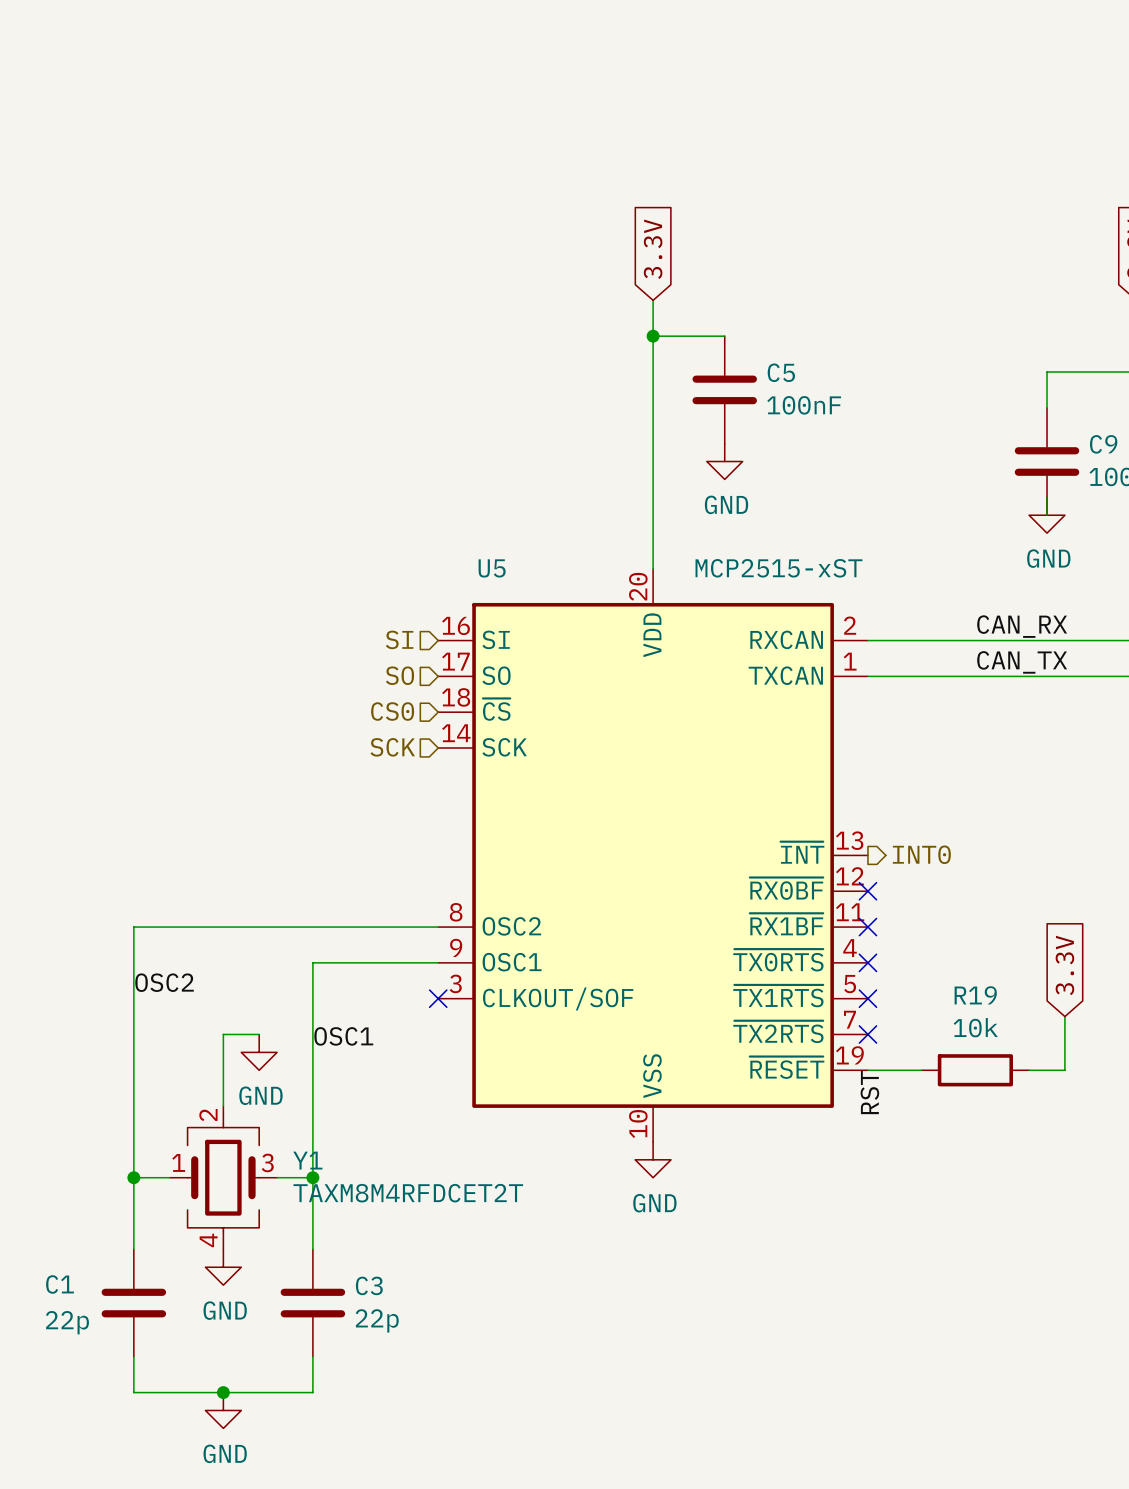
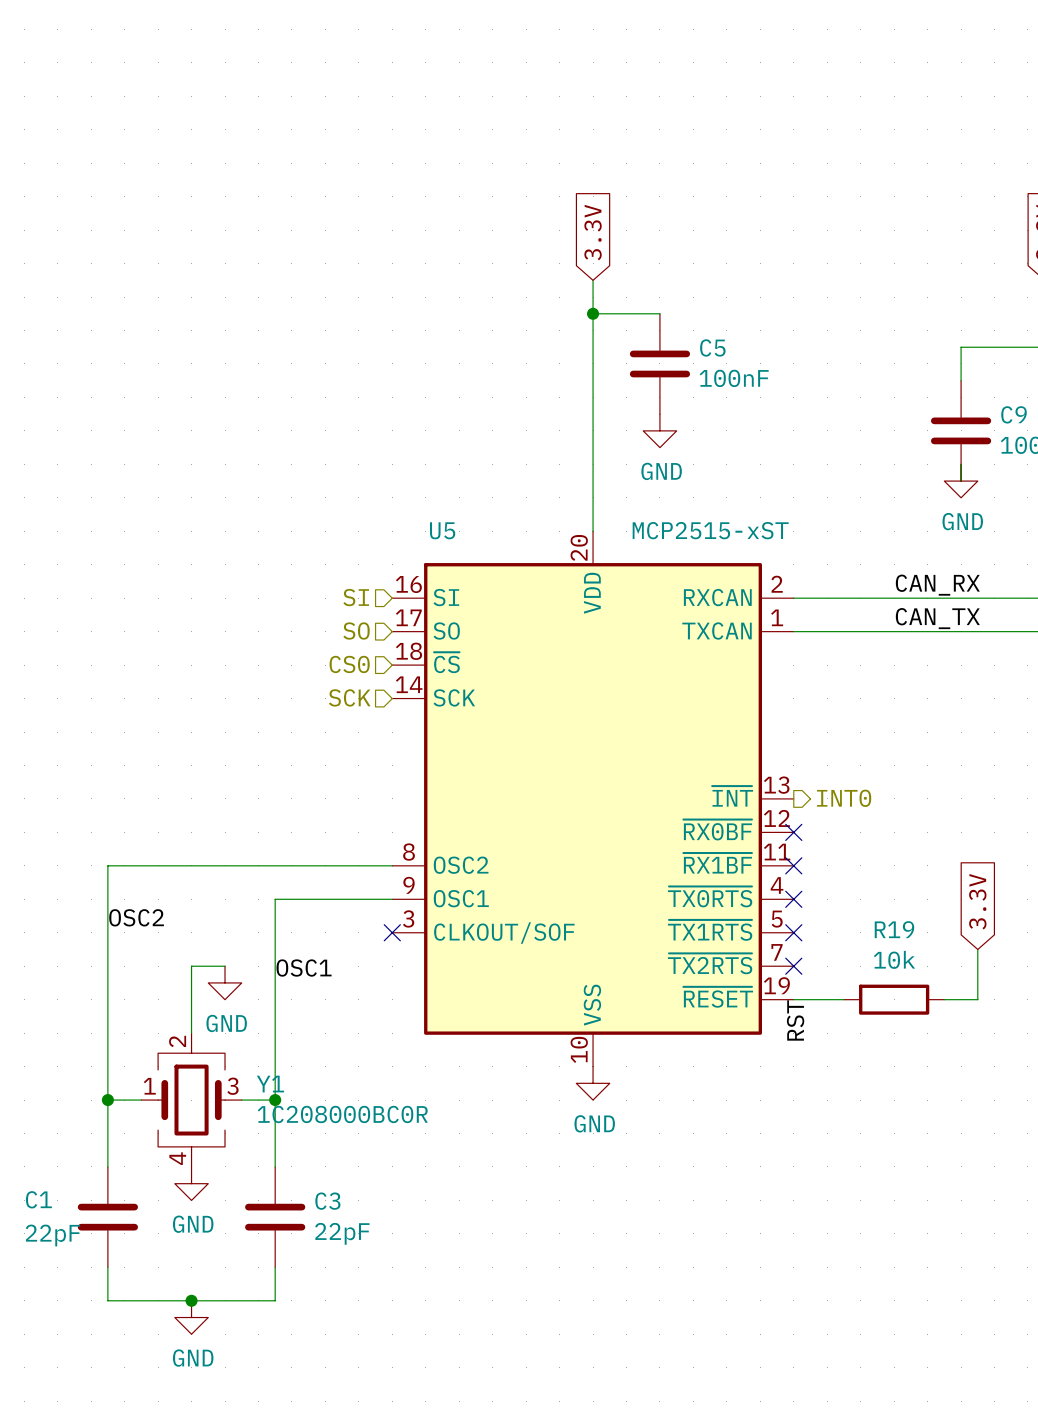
Y1 value: TAXM8M4RFDCET2T (408, 1193) -> 1C208000BC0R (342, 1114)
C3 value: 22p (377, 1320) -> 22pF (342, 1233)
C1 value: 22p (67, 1322) -> 22pF (52, 1235)

